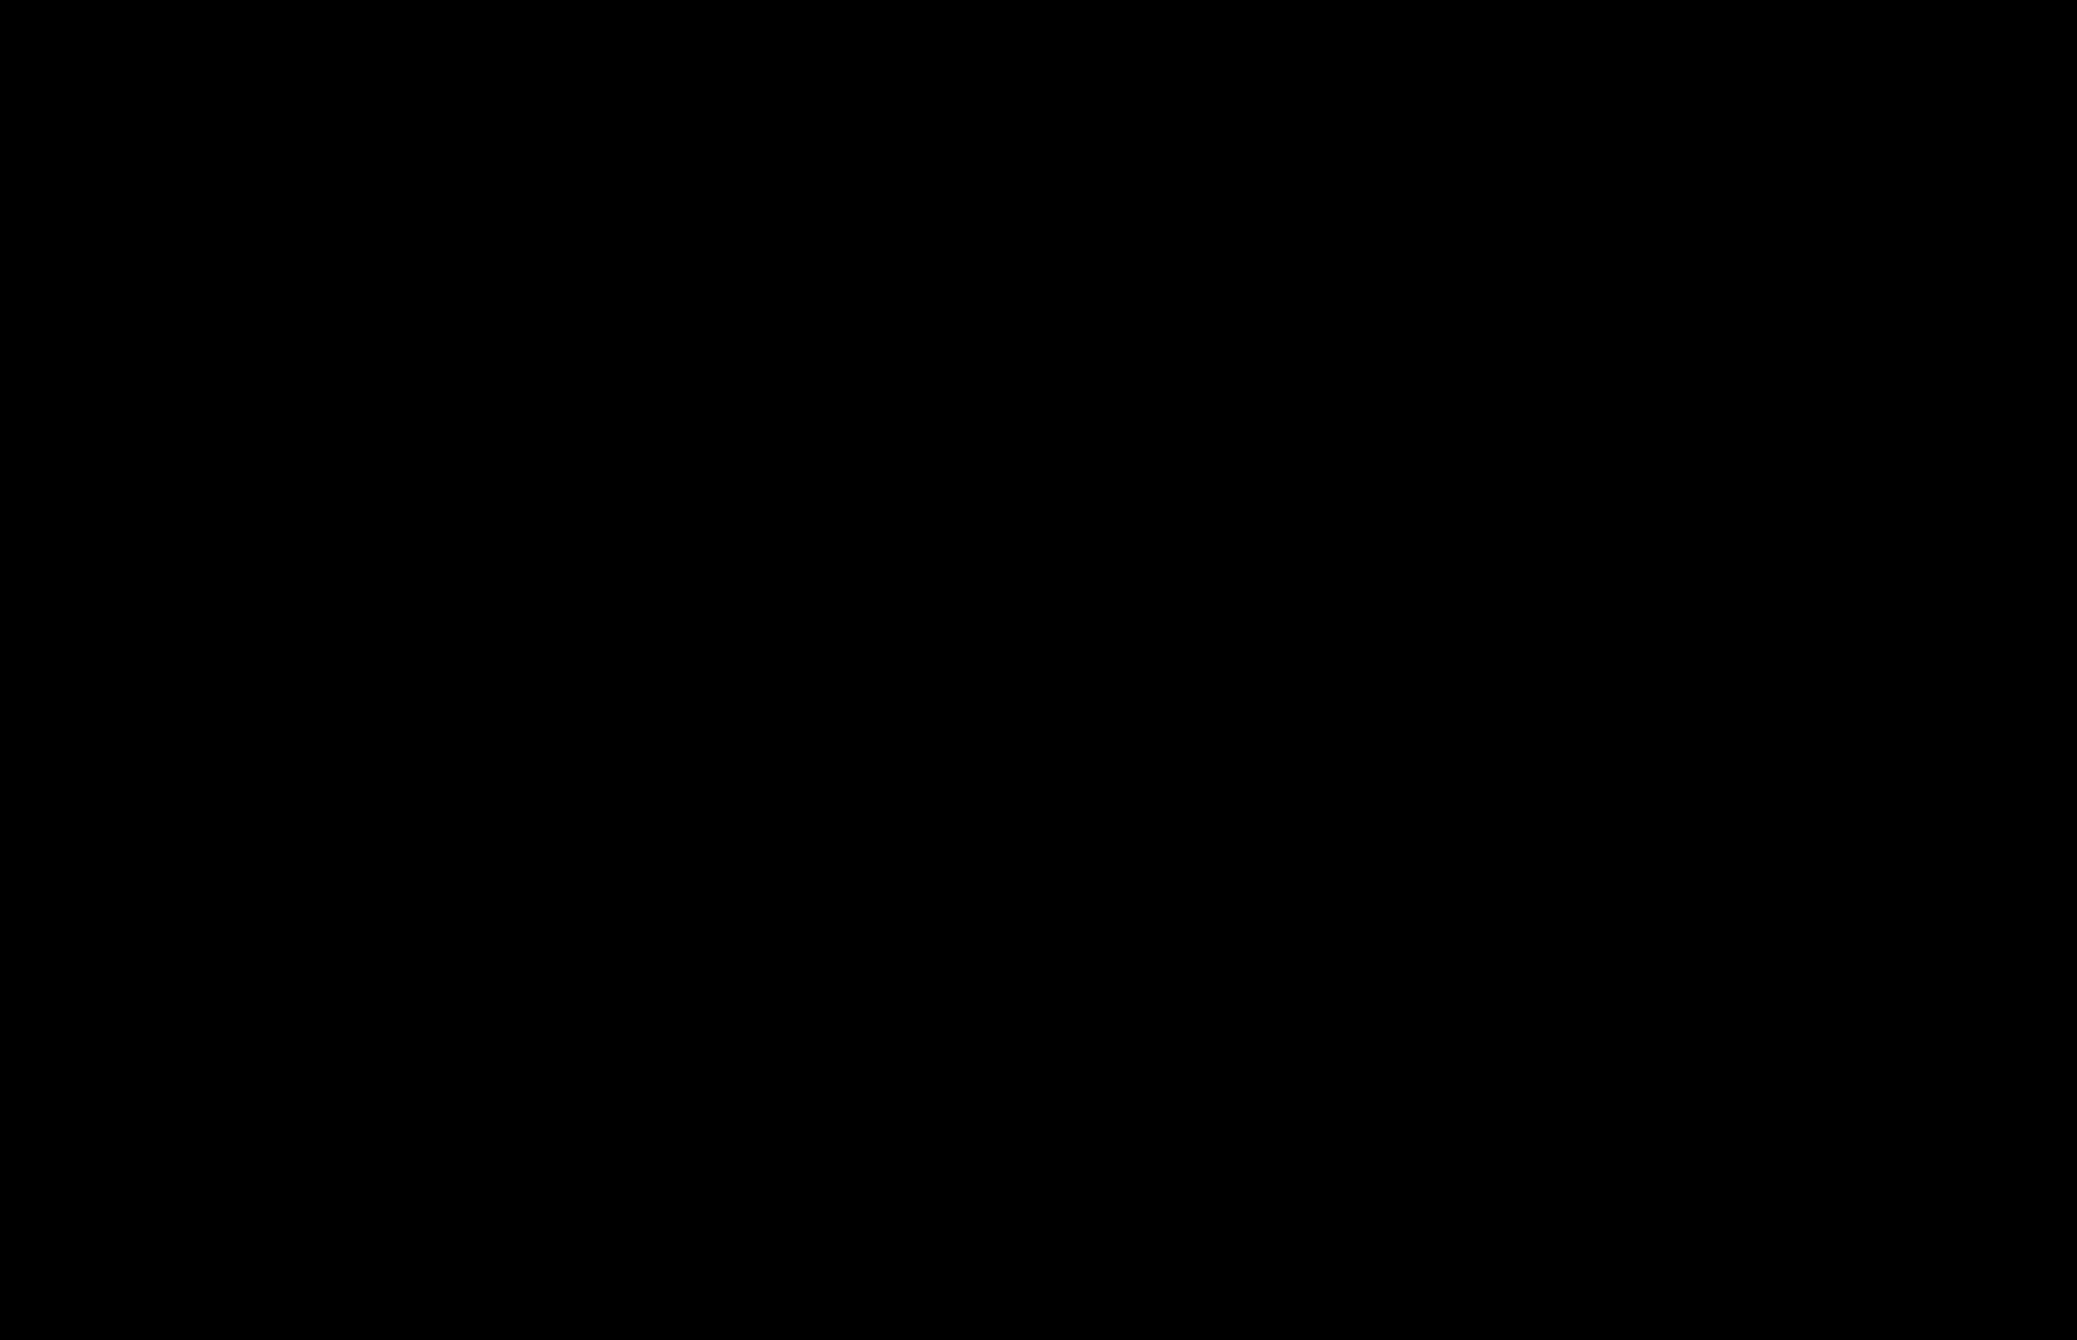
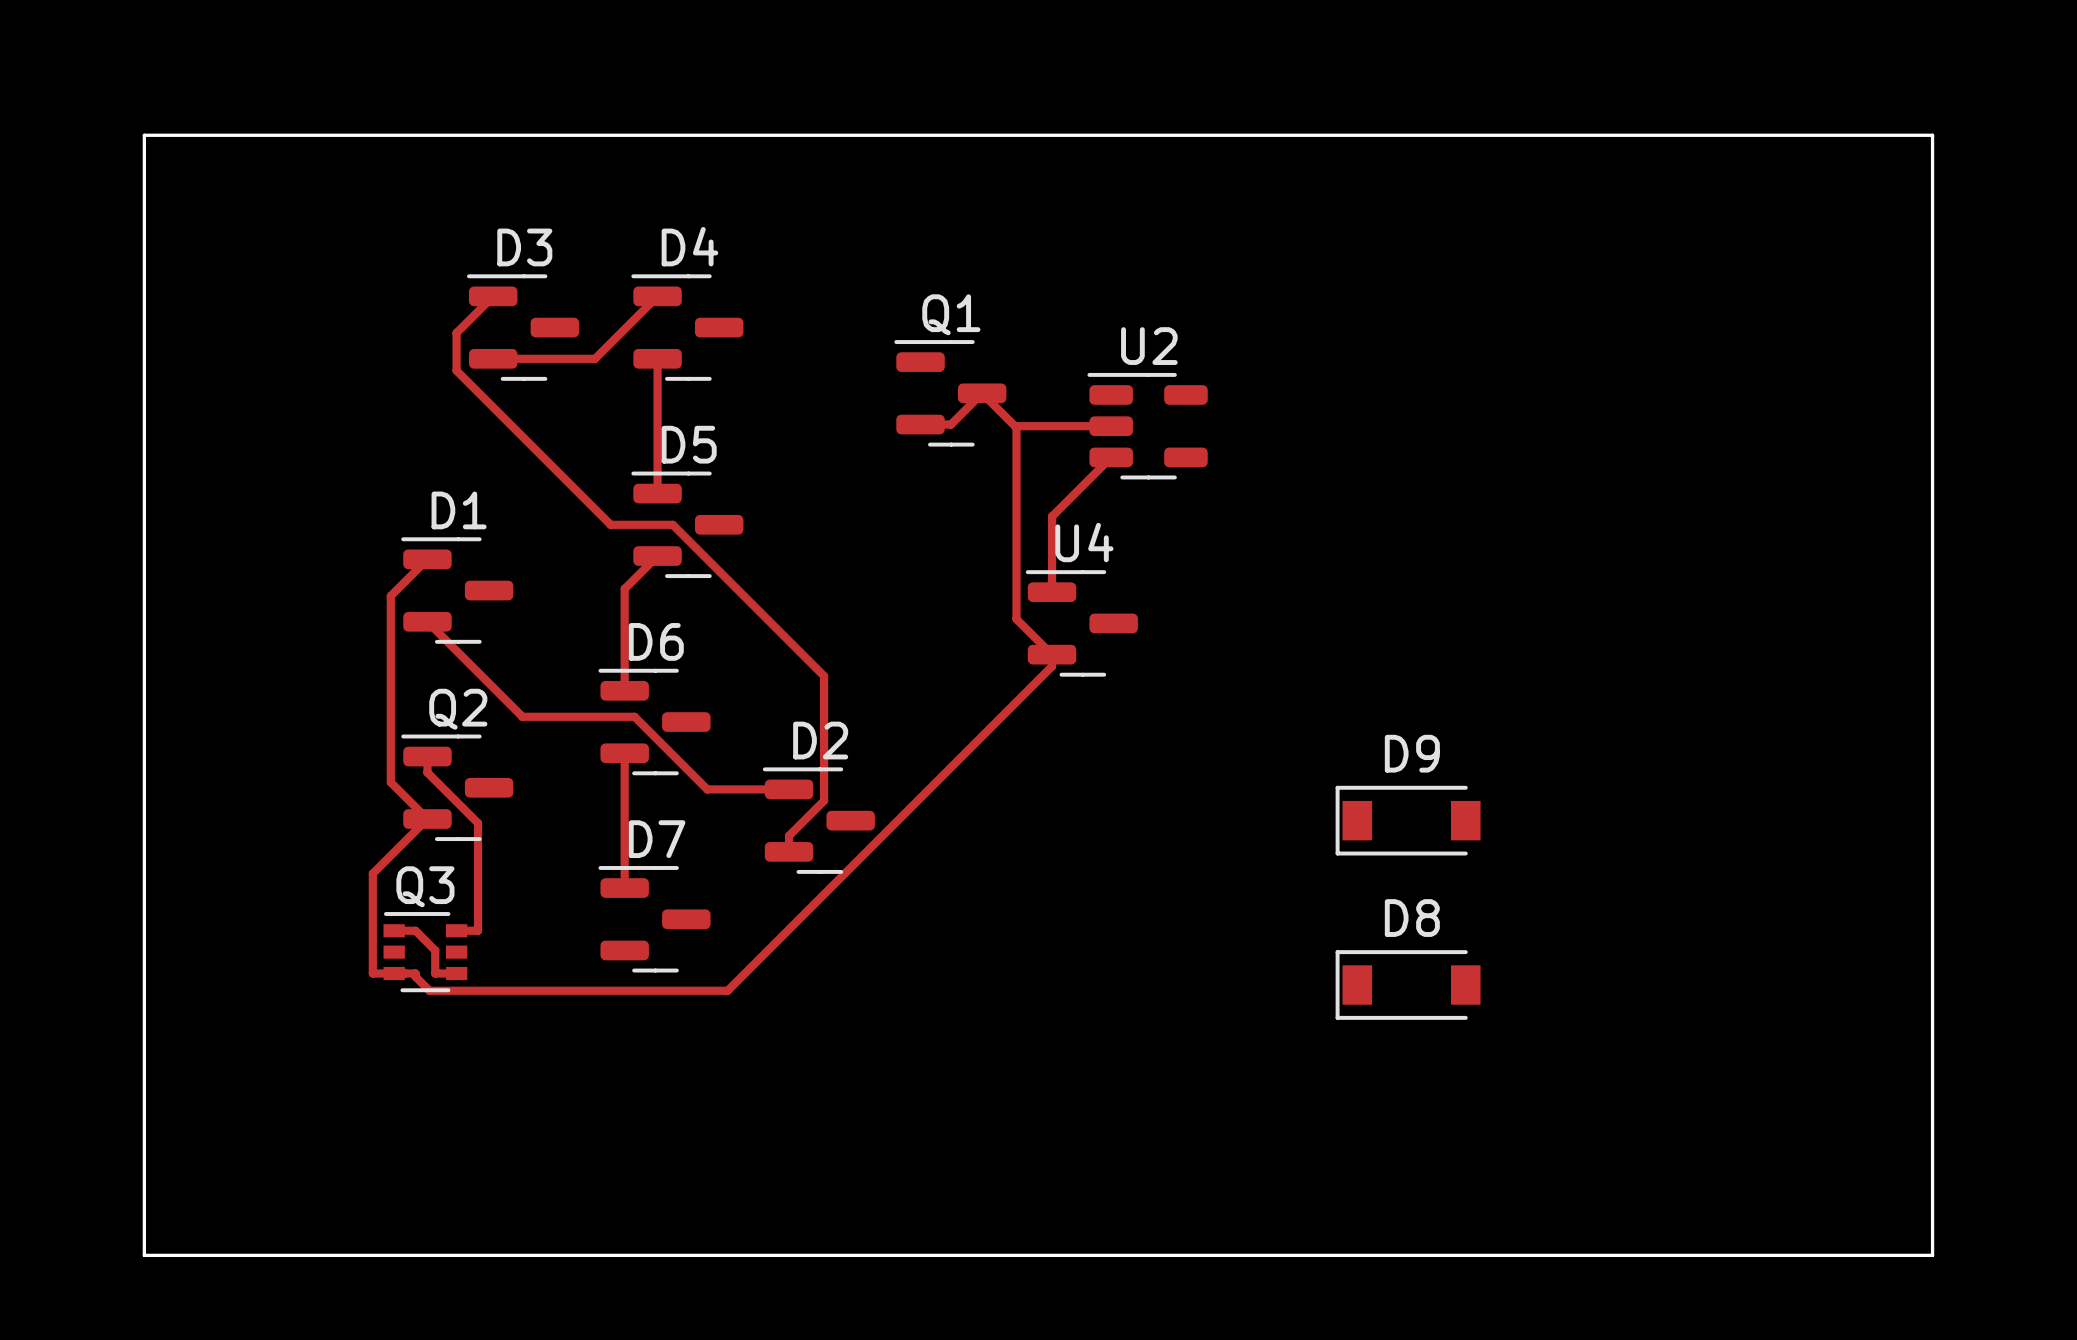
board edge: none -> (144, 135) (1932, 135) (1932, 1255) (144, 1255) (144, 135)
track: none -> (493, 296) (456, 333) (456, 370) (610, 524) (672, 524) (824, 676) (824, 800) (789, 835) (789, 851)
track: none -> (657, 296) (595, 358) (493, 358)
D3: none -> (523, 327)
D4: none -> (687, 327)
track: none -> (657, 358) (657, 493)
Q1: none -> (950, 393)
track: none -> (920, 424) (950, 424) (982, 393) (1015, 426) (1111, 426)
track: none -> (1016, 426) (1016, 619) (1052, 654) (1052, 666) (727, 990) (429, 990) (415, 976) (415, 973) (372, 973) (372, 873) (427, 819) (390, 782) (390, 595) (427, 559)
U2: none -> (1147, 426)
track: none -> (1111, 457) (1052, 516) (1052, 592)
D5: none -> (687, 524)
track: none -> (657, 556) (624, 588) (624, 690)
D1: none -> (457, 590)
track: none -> (427, 621) (522, 716) (634, 716) (707, 789) (789, 789)
U4: none -> (1081, 623)
D6: none -> (654, 722)
track: none -> (624, 753) (624, 888)
track: none -> (427, 756) (427, 772) (478, 823) (478, 930) (456, 930)
Q2: none -> (457, 787)
D2: none -> (818, 820)
D9: none -> (1408, 820)
D7: none -> (654, 919)
track: none -> (394, 930) (415, 930) (435, 950) (435, 973) (456, 973)
Q3: none -> (425, 952)
D8: none -> (1408, 985)

